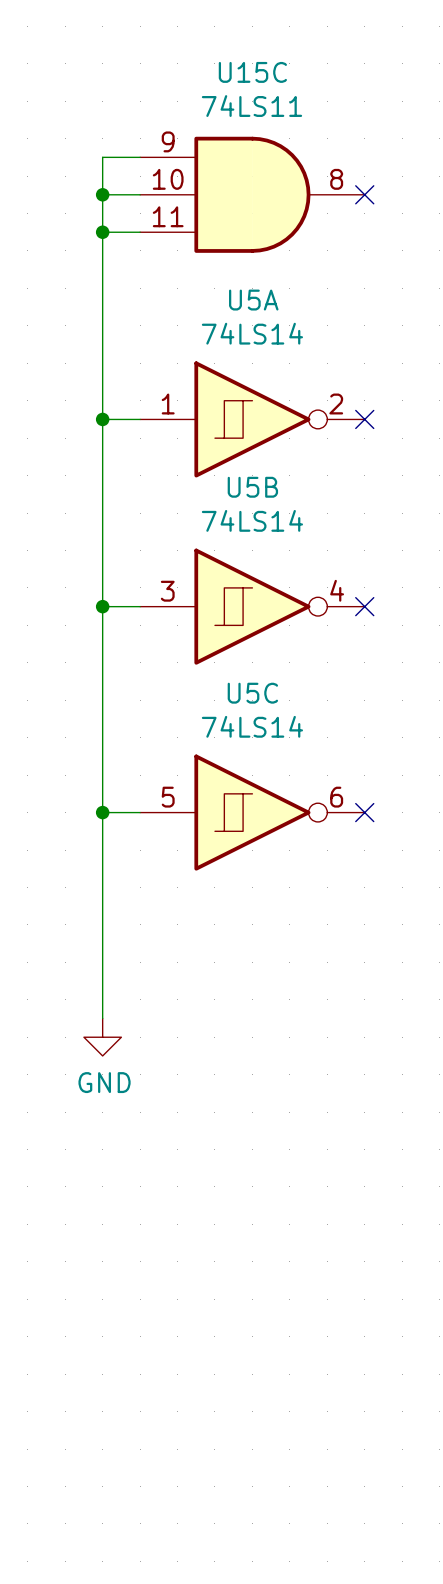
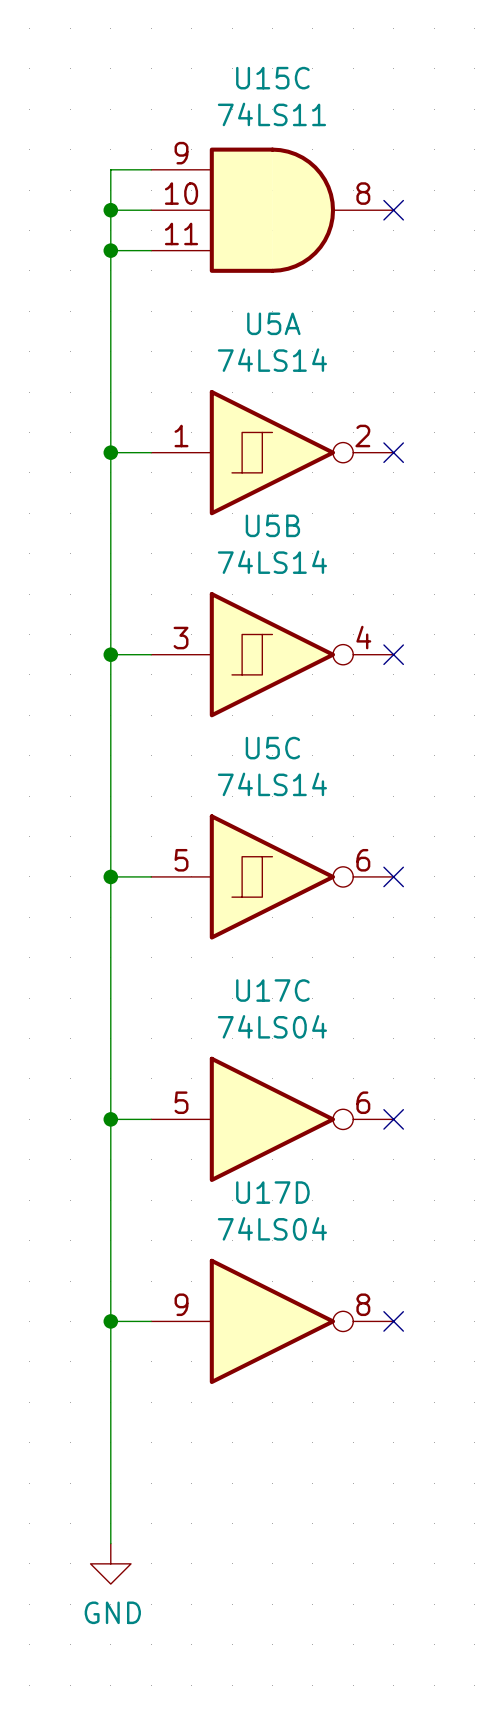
wire: none -> (110, 1099) (110, 1543)
wire: none -> (110, 1119) (151, 1119)
power symbol: GND (102, 1037) -> none
junction: none -> (110, 1119)
U17C: none -> 74LS04 (272, 1119)
no-connect mark: none -> (393, 1119)
wire: none -> (110, 1321) (151, 1321)
junction: none -> (110, 1321)
U17D: none -> 74LS04 (272, 1321)
no-connect mark: none -> (393, 1321)
power symbol: none -> GND (110, 1563)

